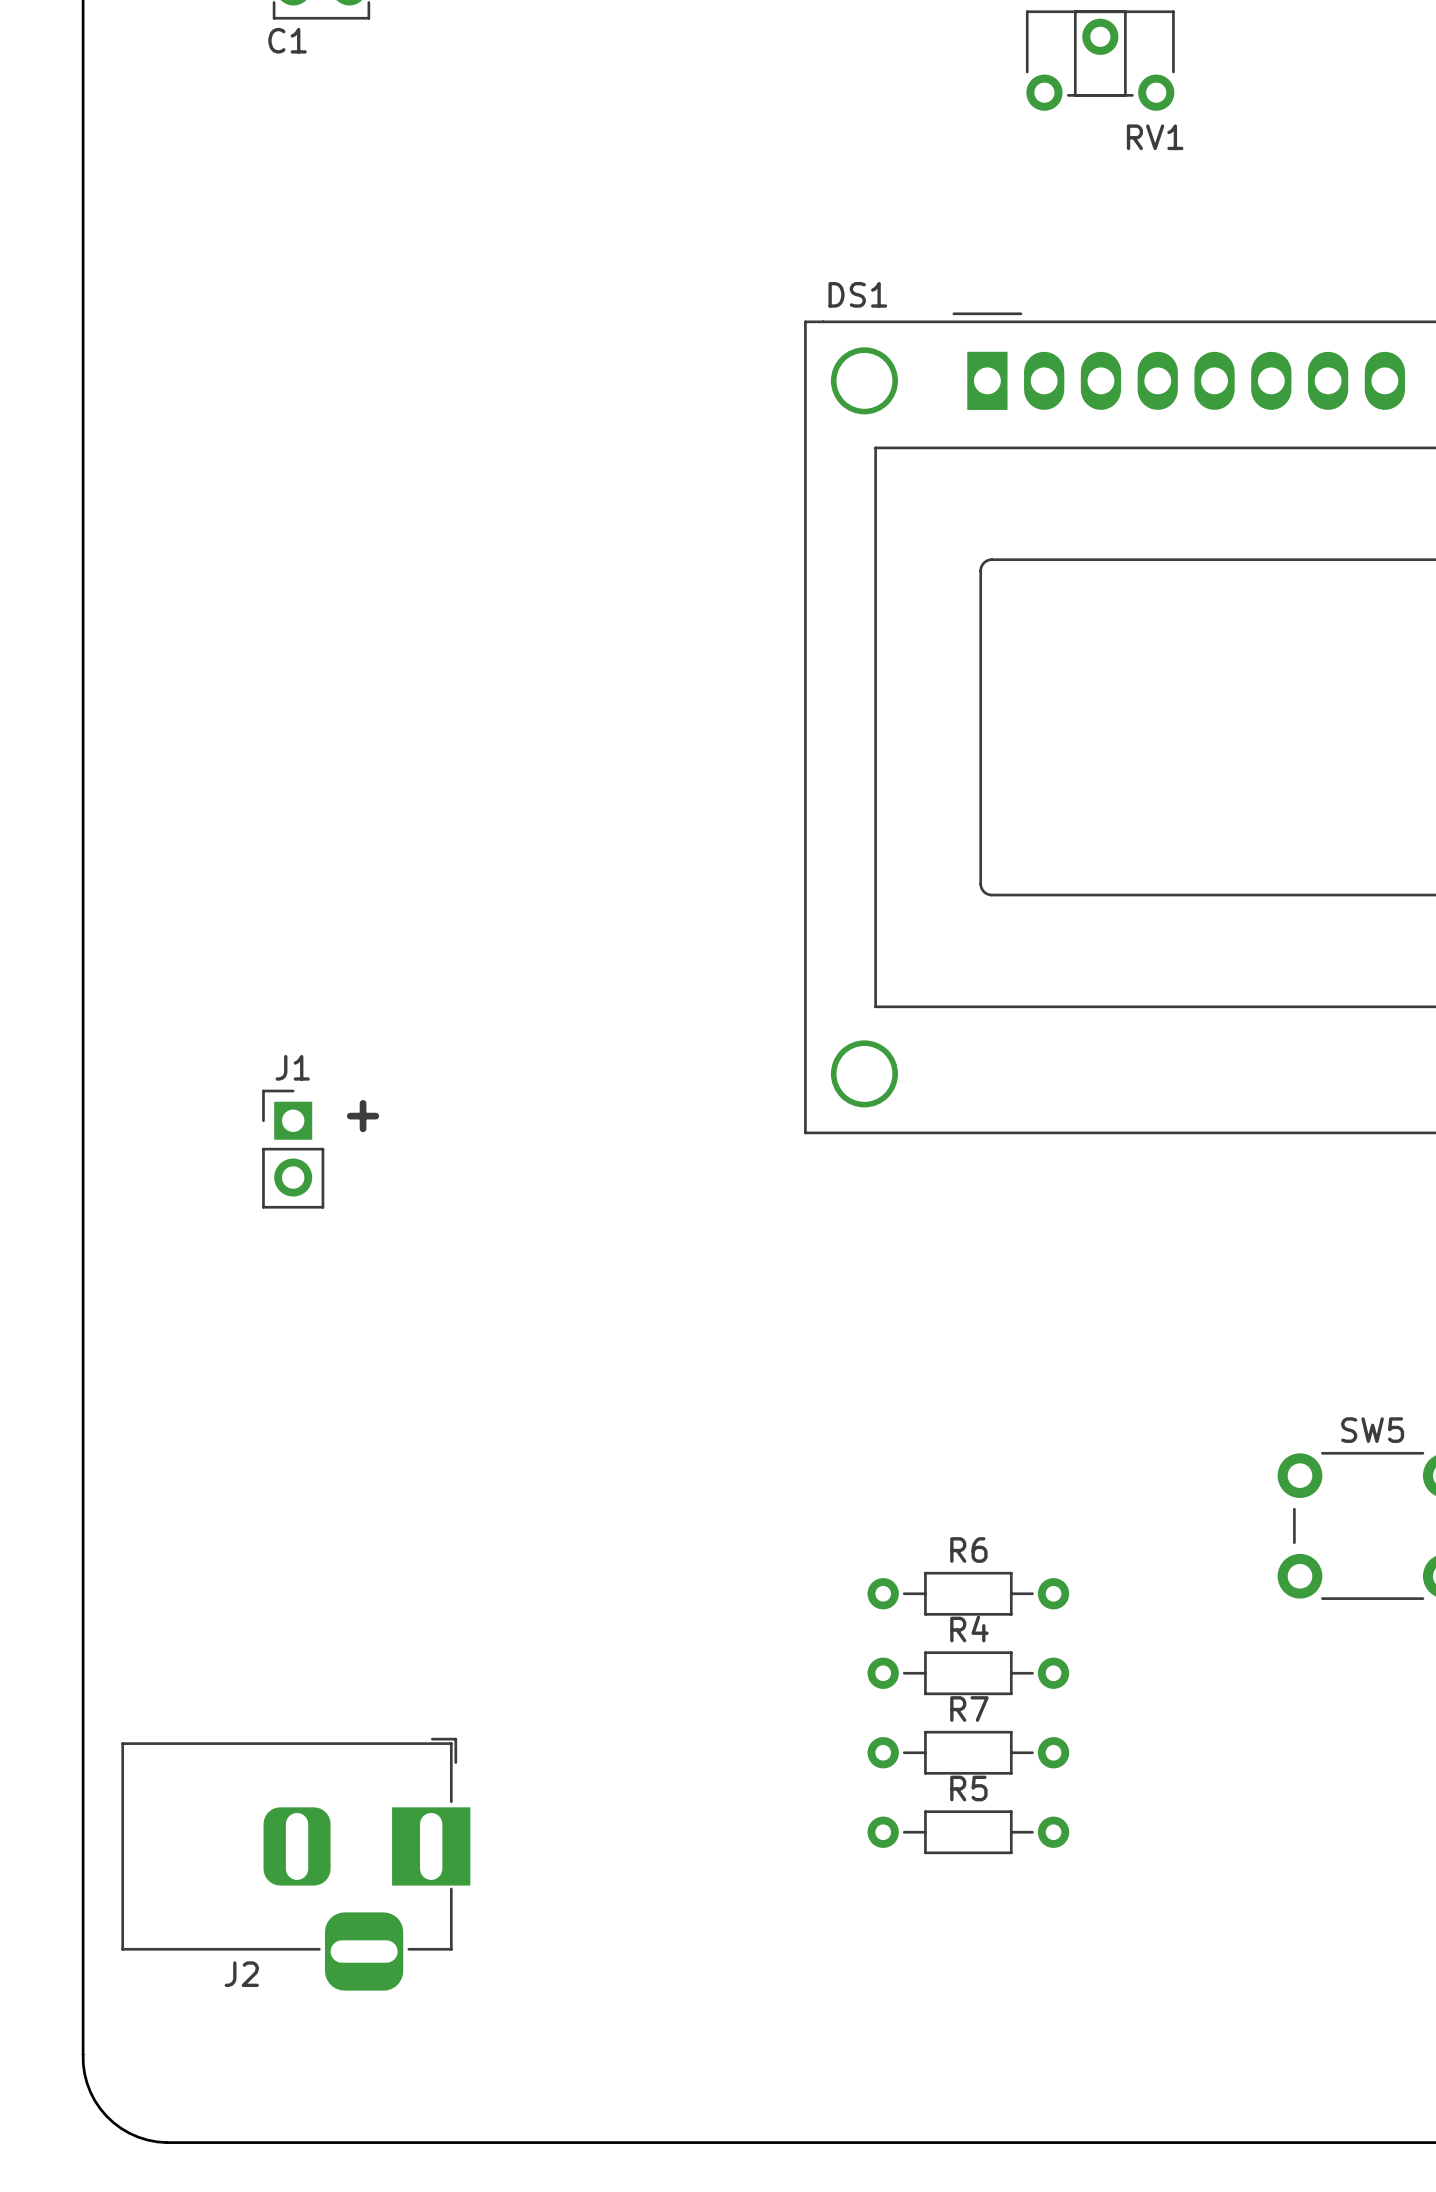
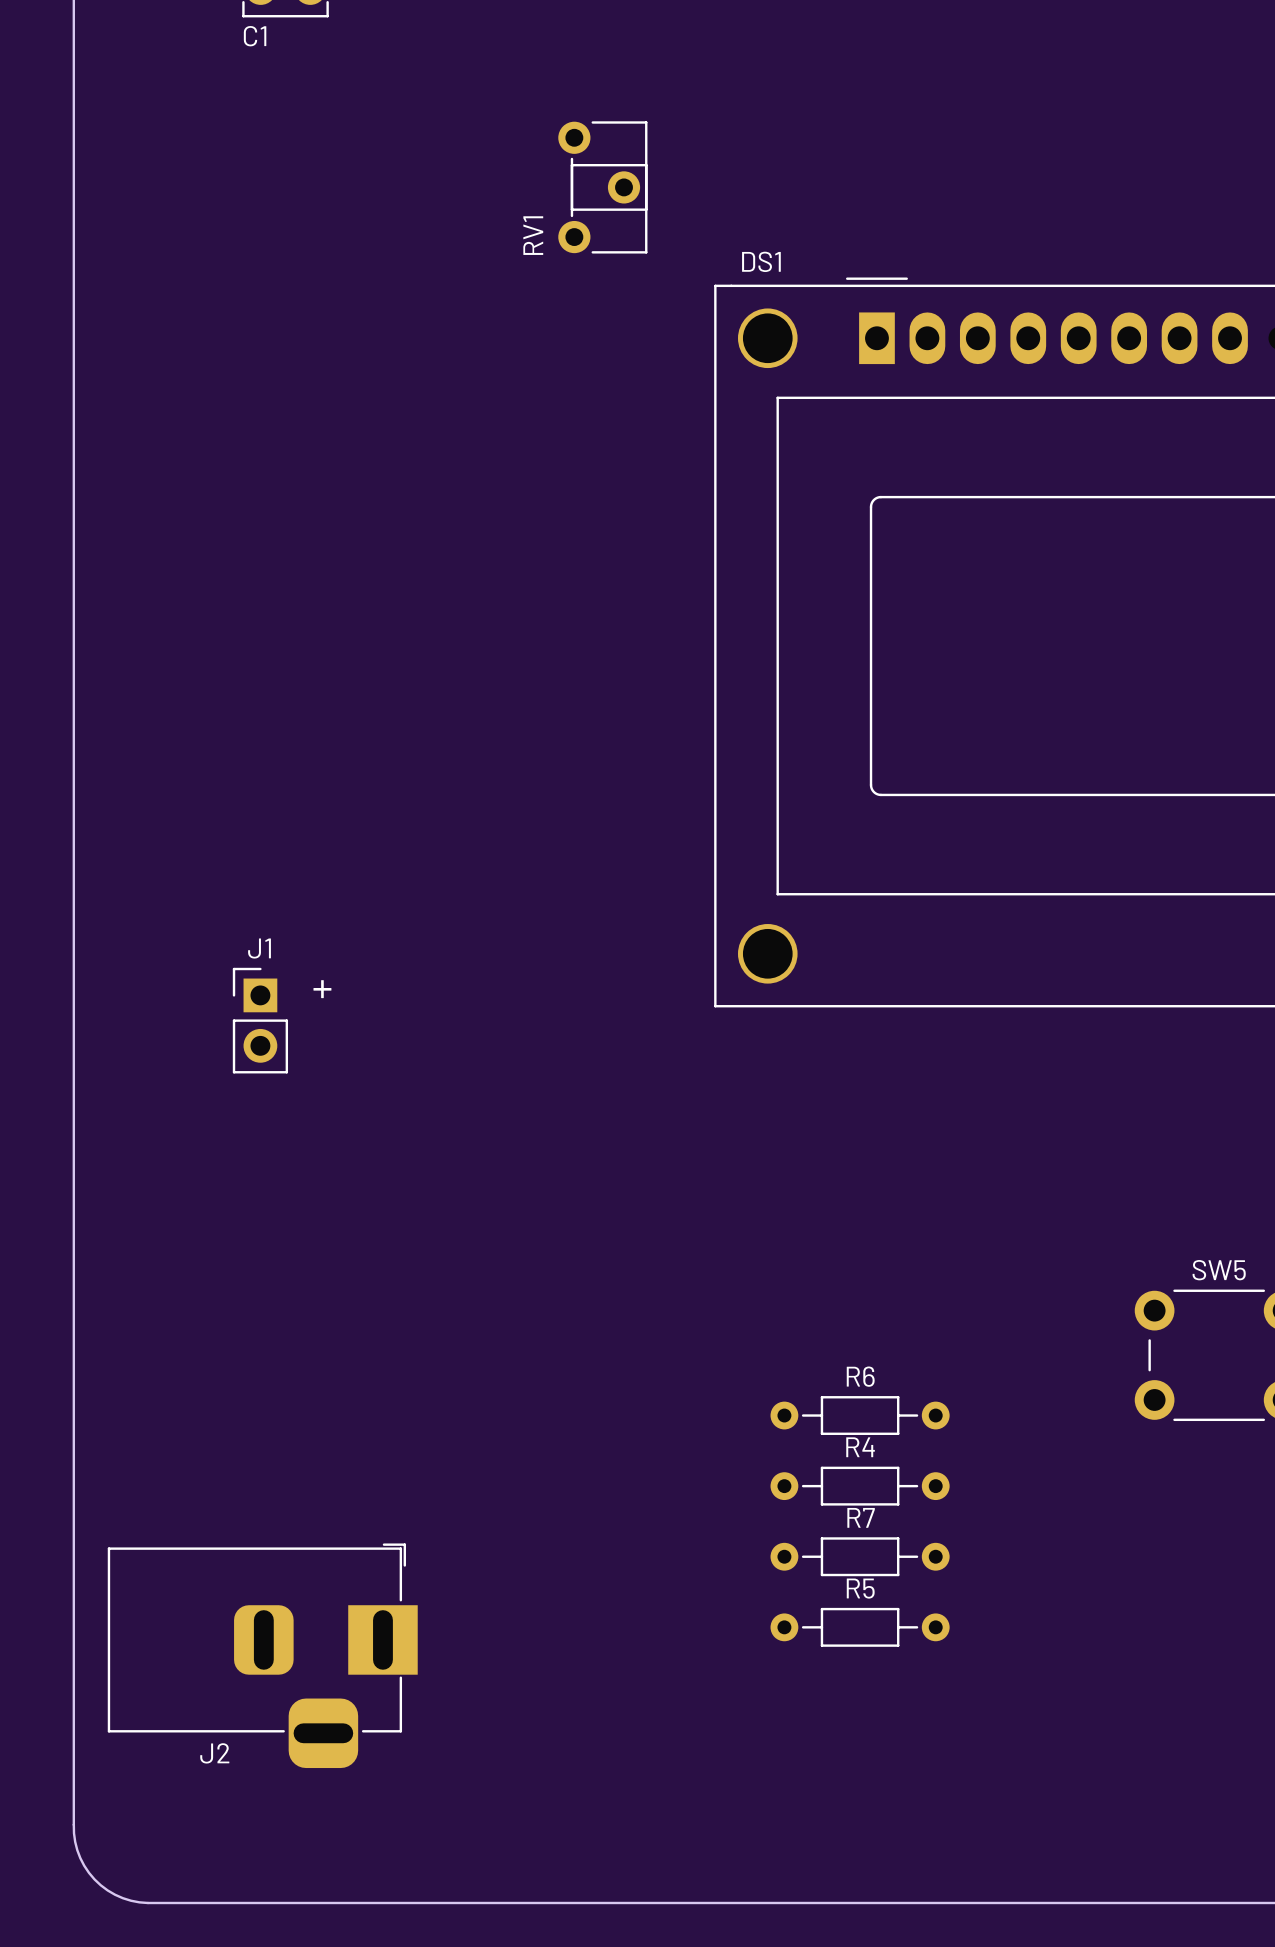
RV1 footprint: [1025, 10, 1175, 111] -> [558, 121, 648, 254]
RV1 name position: RV1 (1155, 137) -> RV1 (533, 235)

